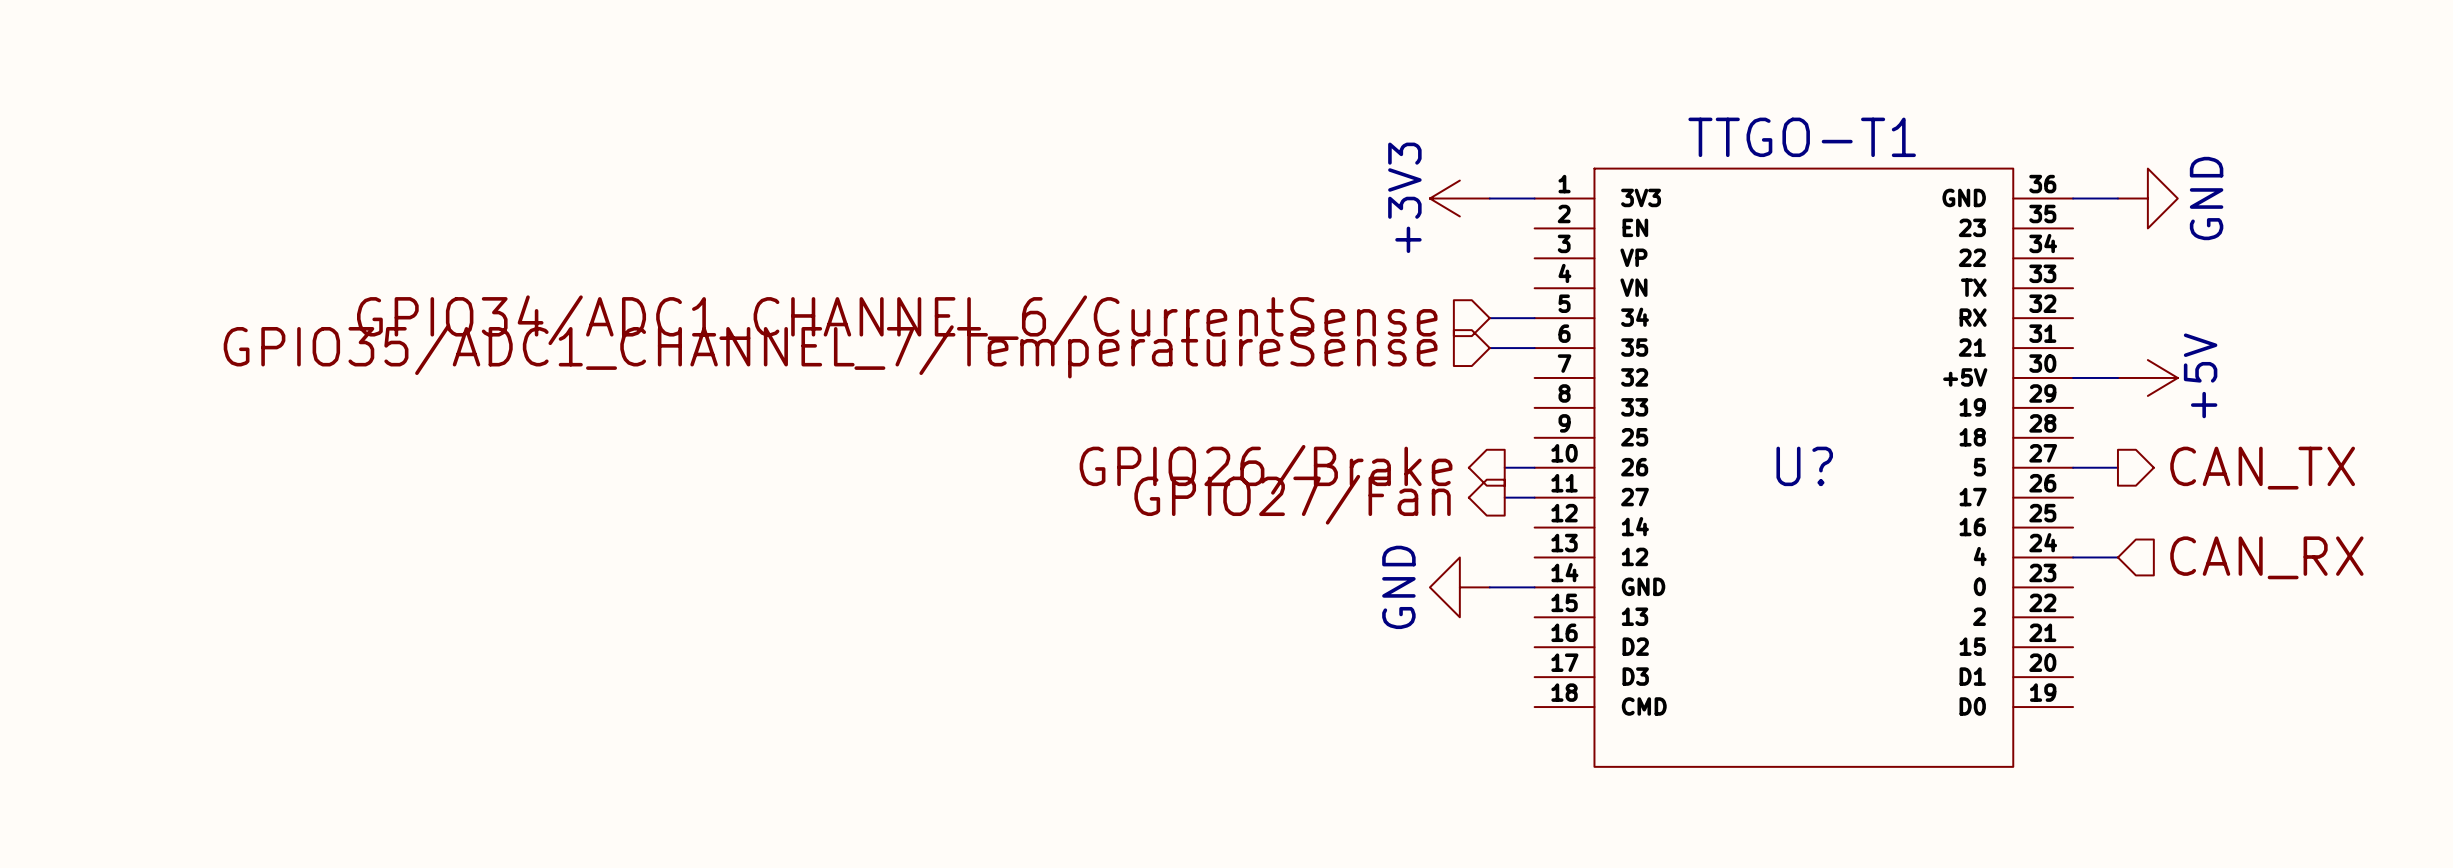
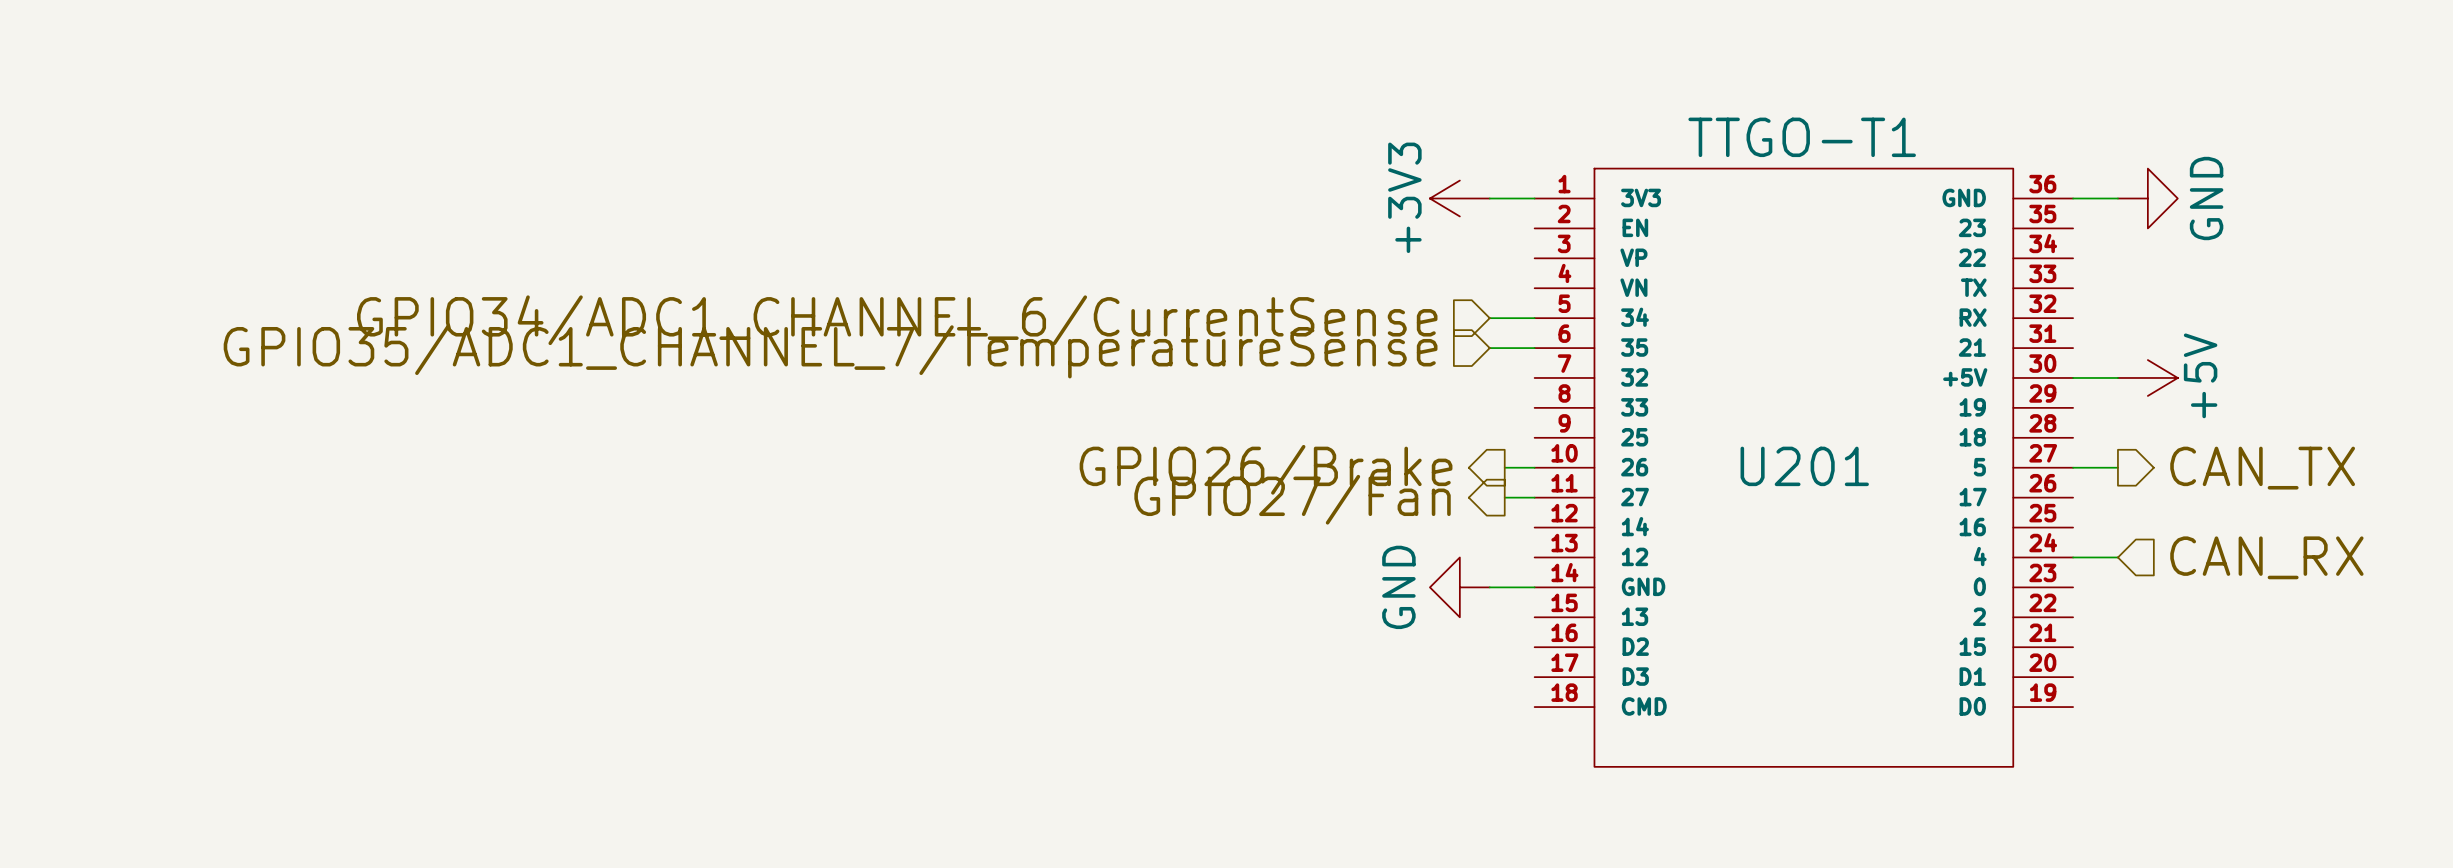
U? name: U? (1804, 466) -> U201 (1804, 466)

